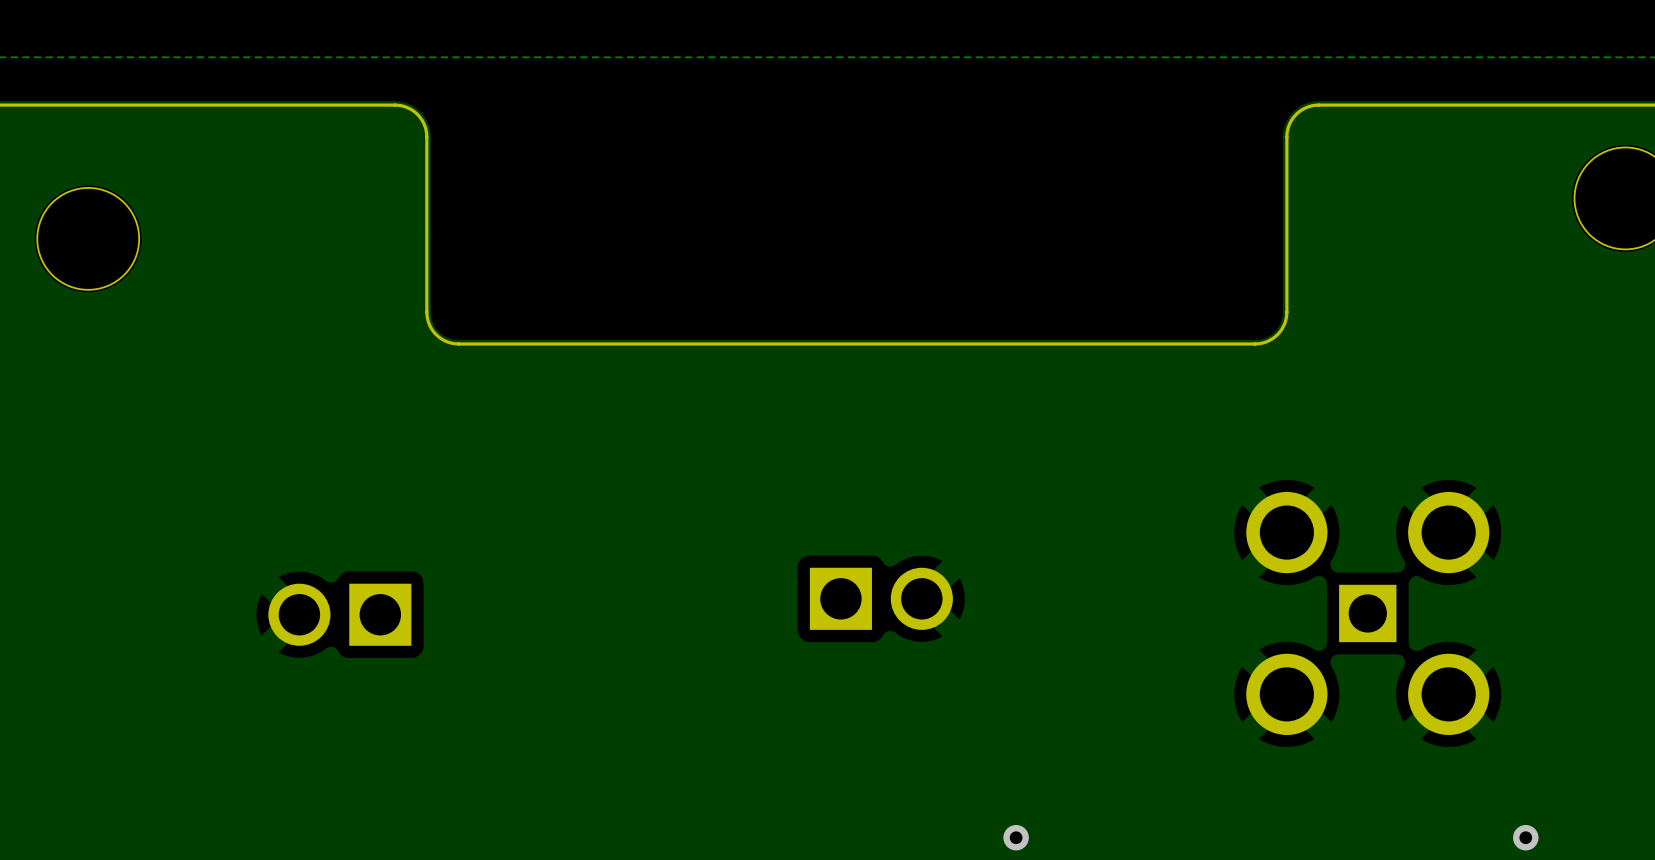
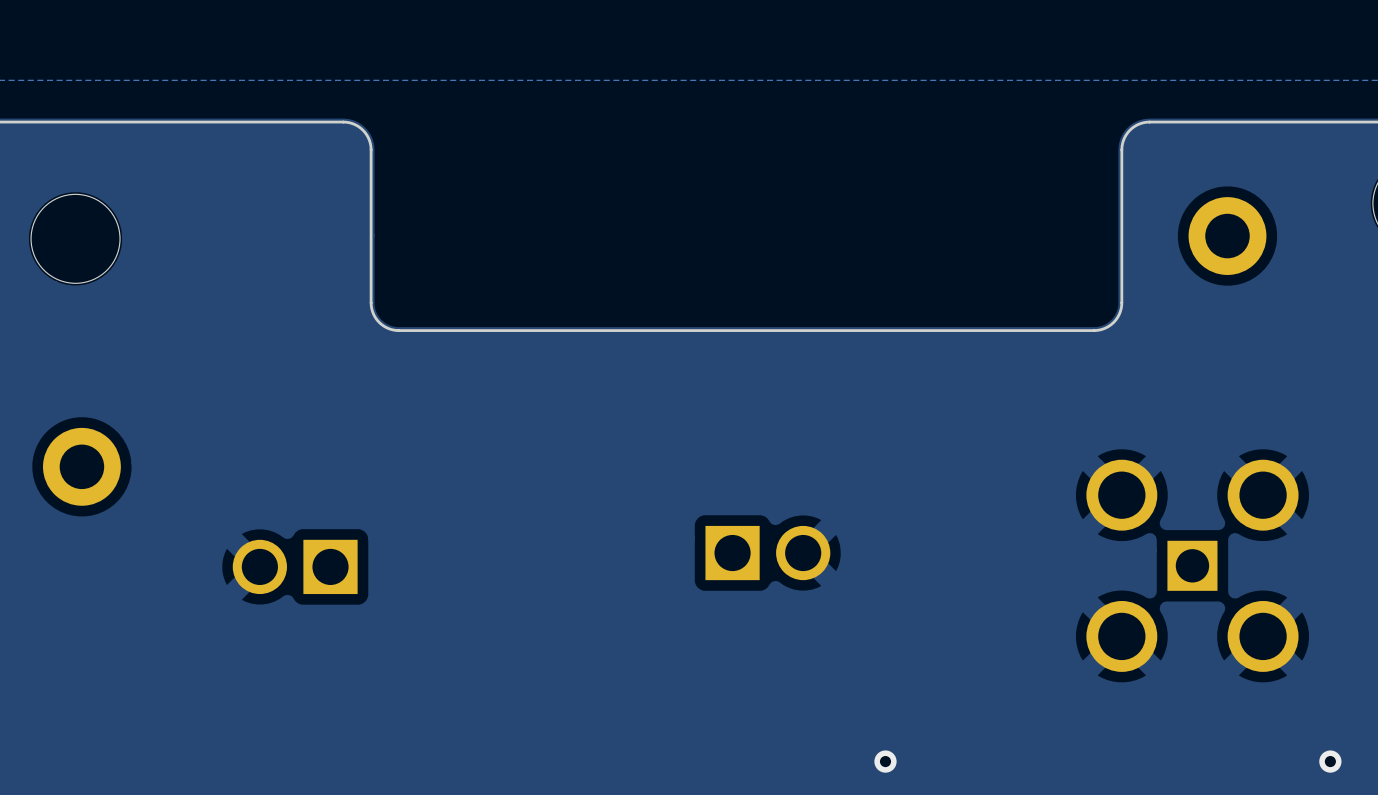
part: none -> (1227, 236)
part: none -> (81, 466)

